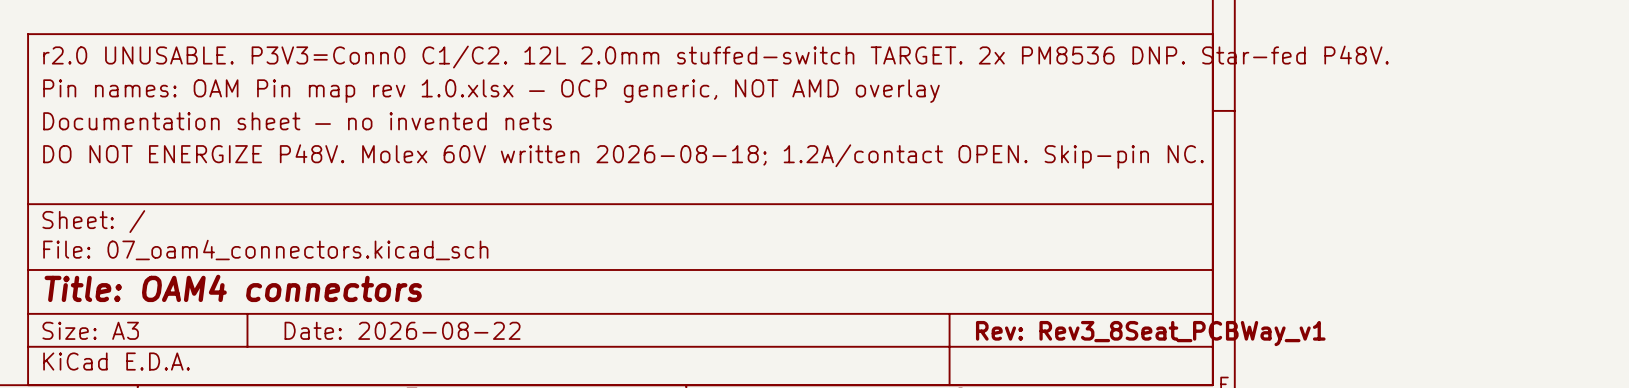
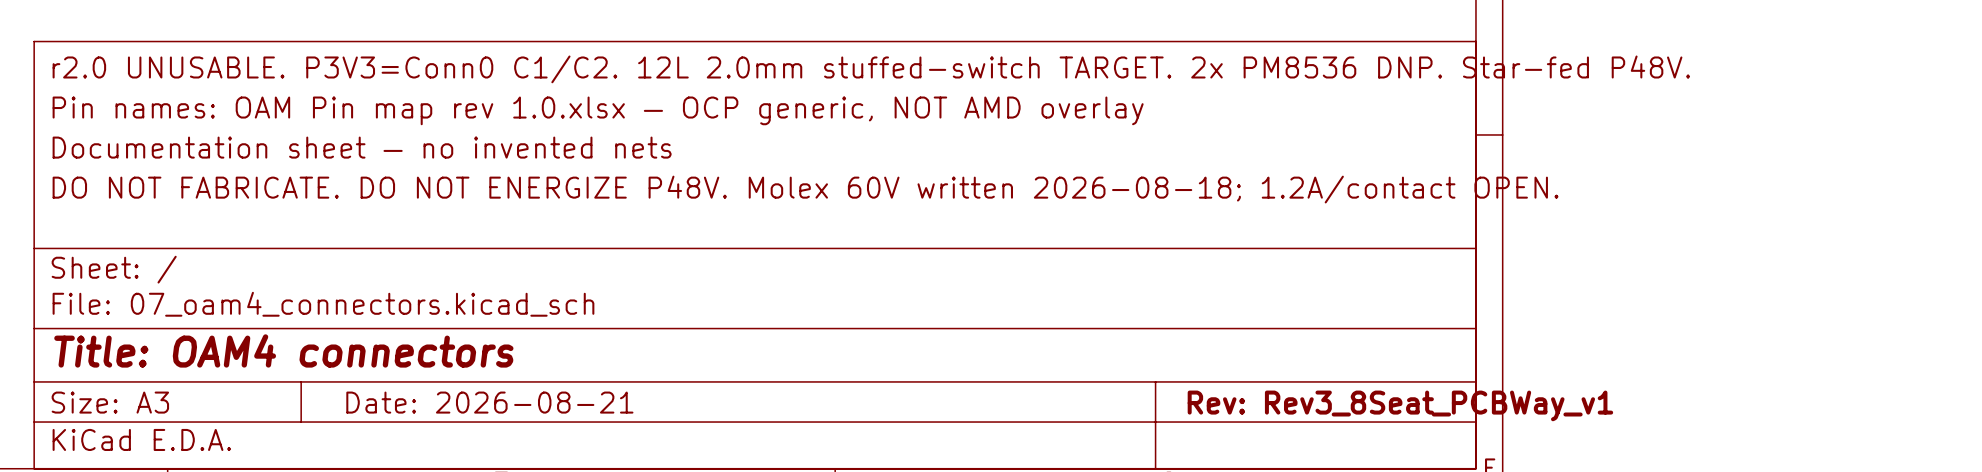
title block: DO NOT ENERGIZE P48V. Molex 60V written 2026-08-18; 1.2A/contact OPEN. Skip-pin NC. (623, 156) -> DO NOT FABRICATE. DO NOT ENERGIZE P48V. Molex 60V written 2026-08-18; 1.2A/contact OPEN. (805, 189)
title block: Date: 2026-08-22 (402, 330) -> Date: 2026-08-21 (489, 402)

